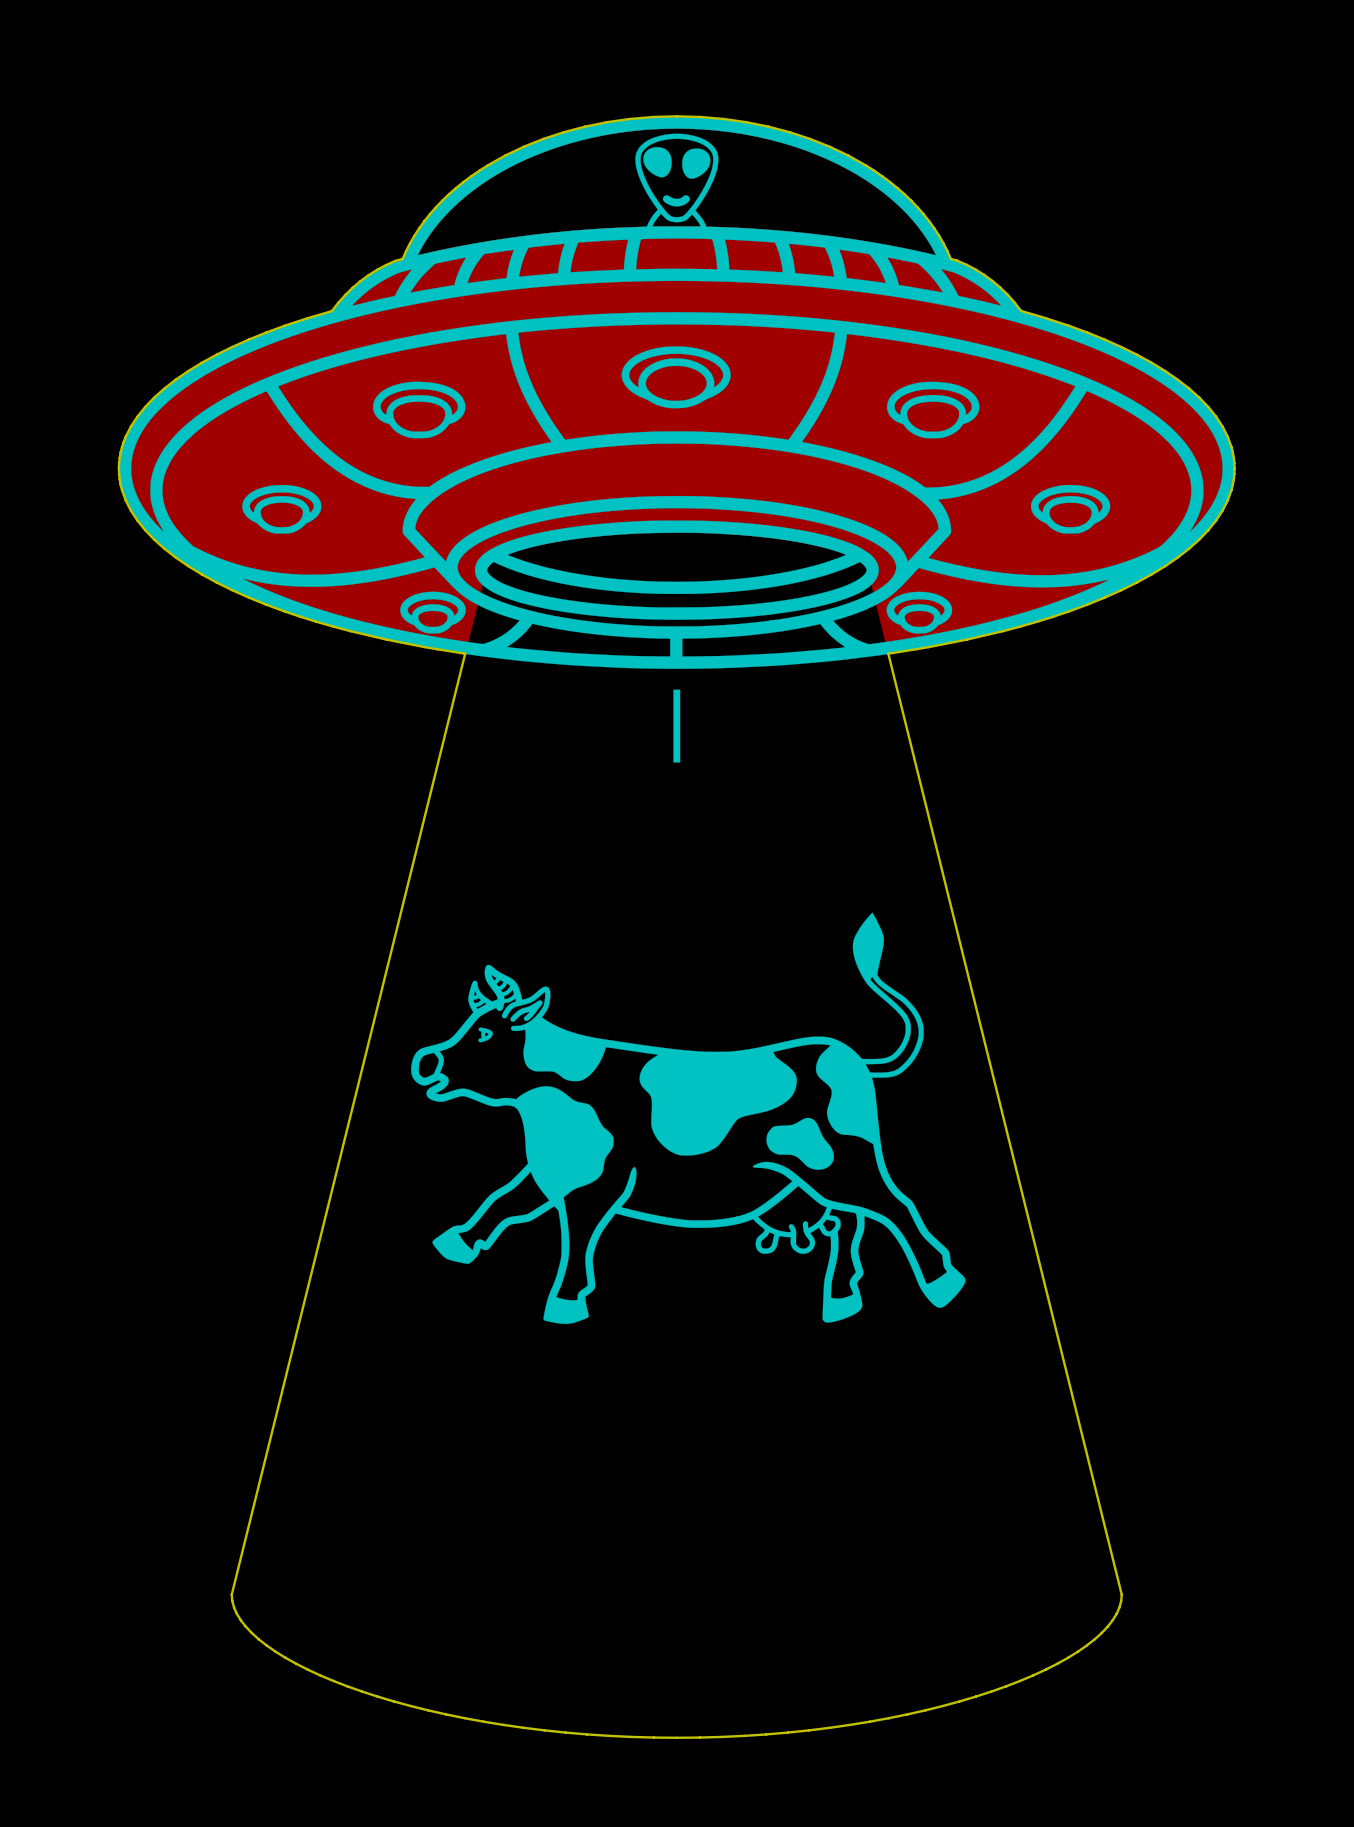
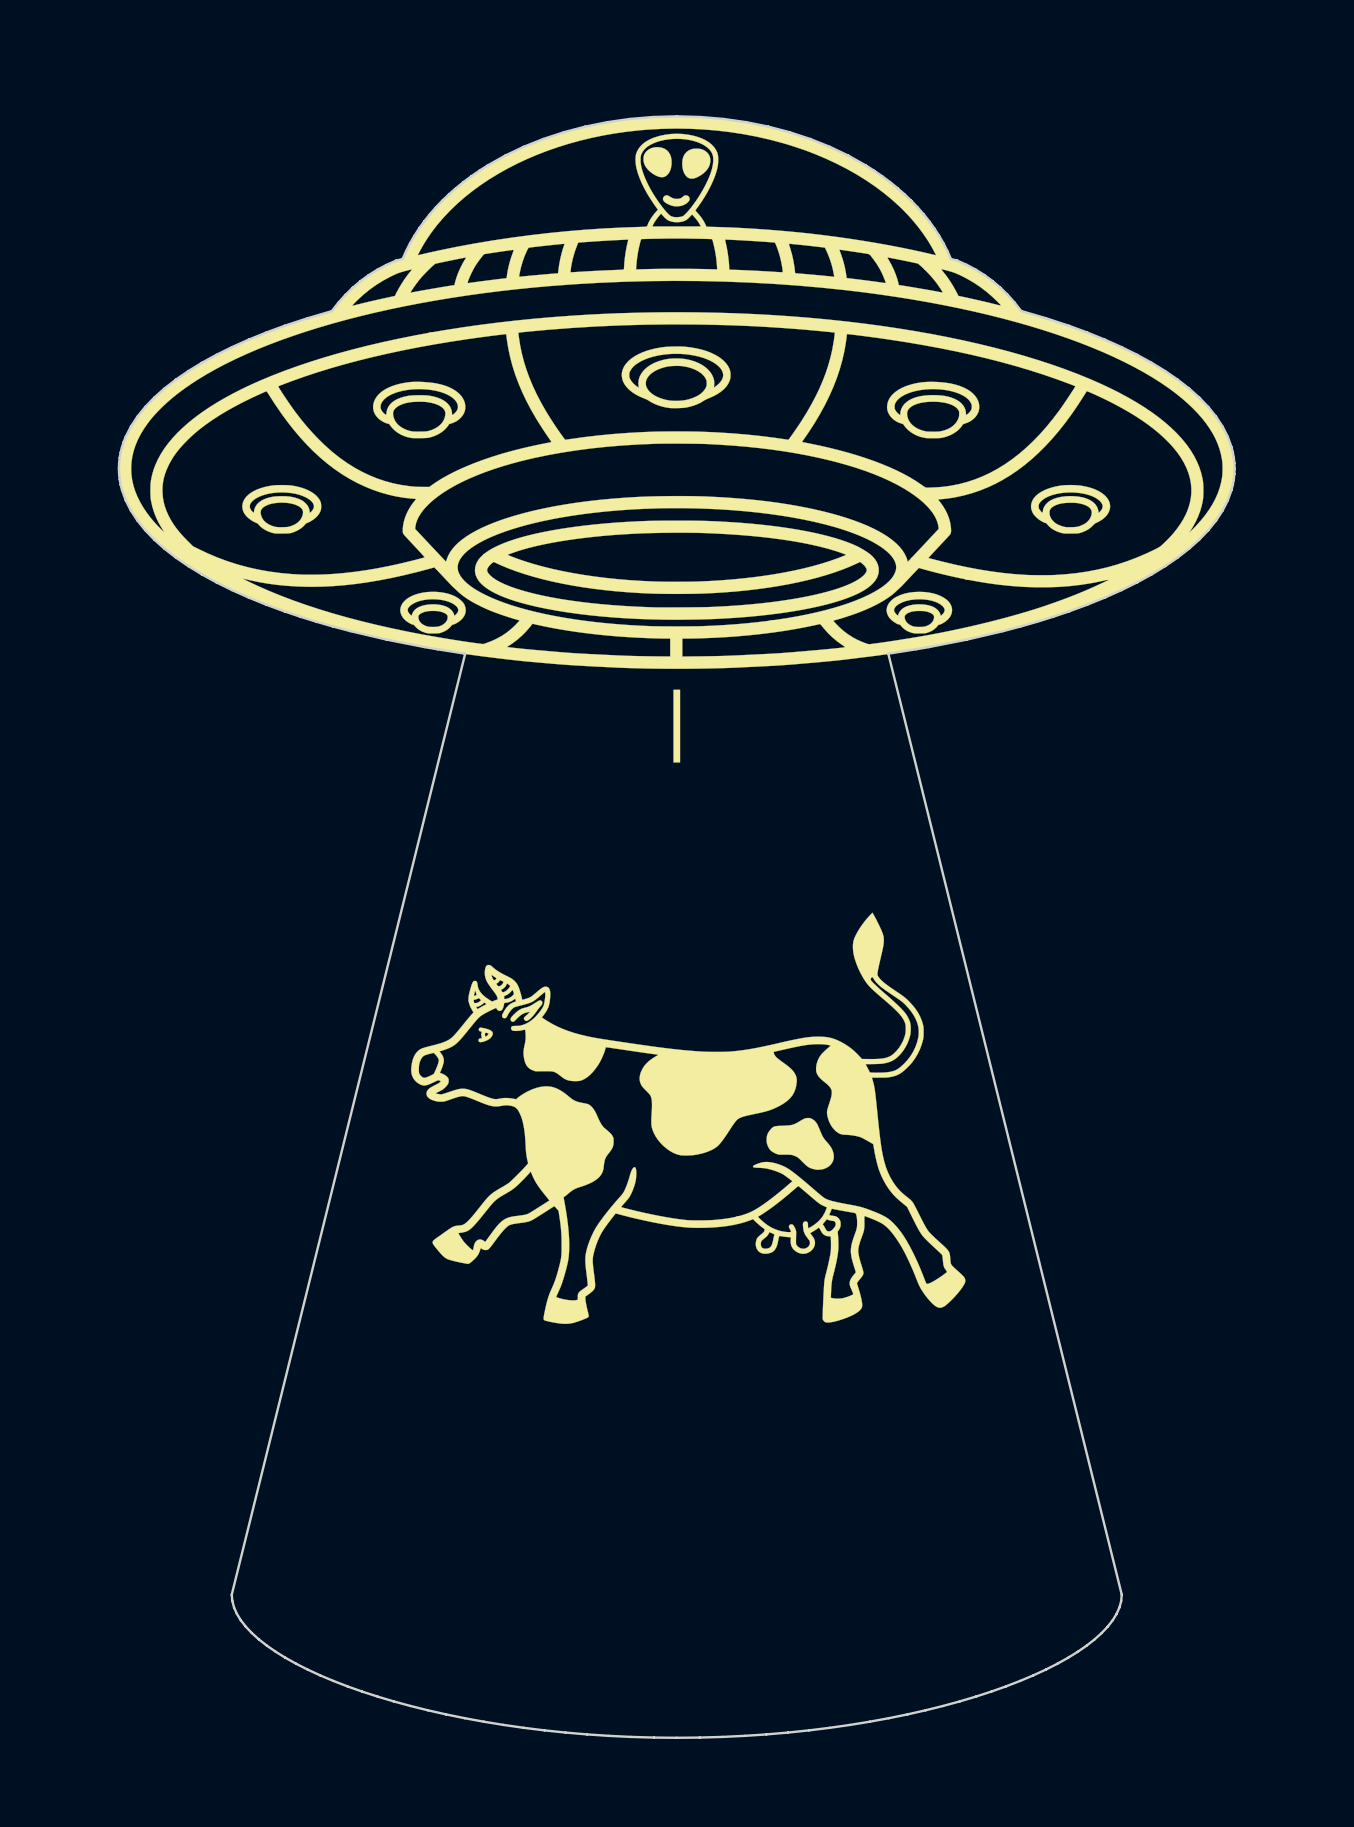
drawing shape: [117, 115, 1236, 1739] -> [117, 115, 1236, 1739]

